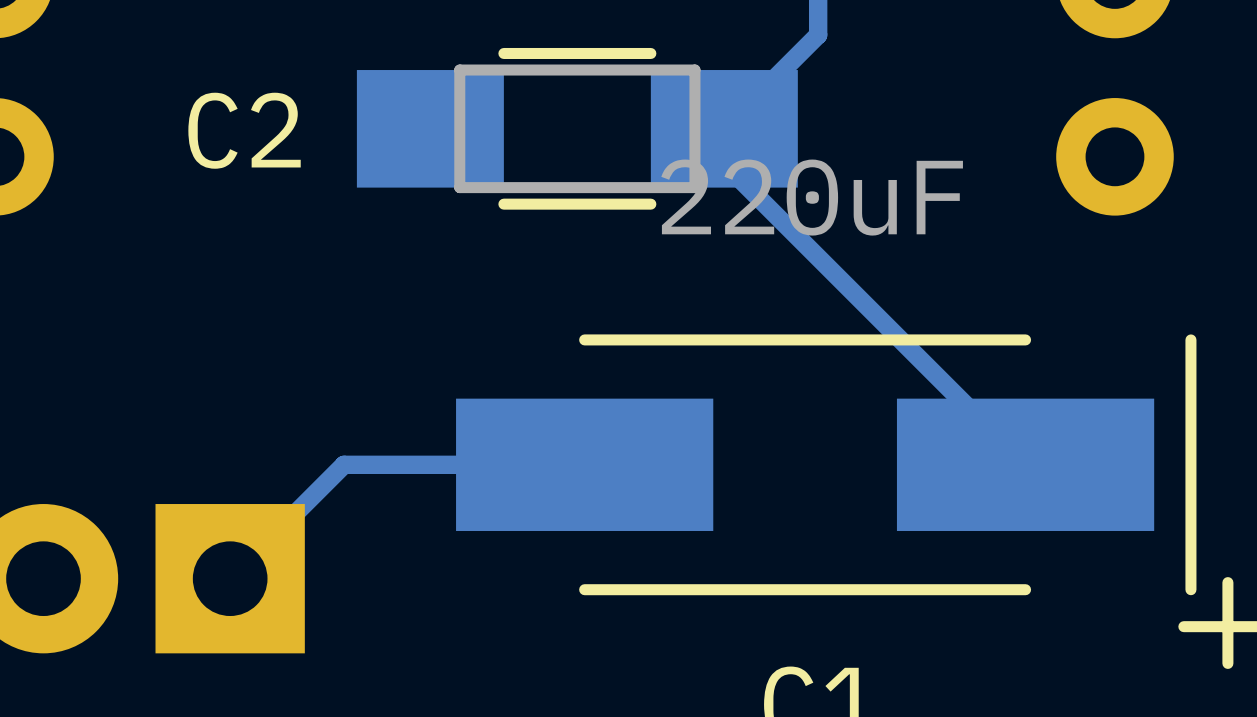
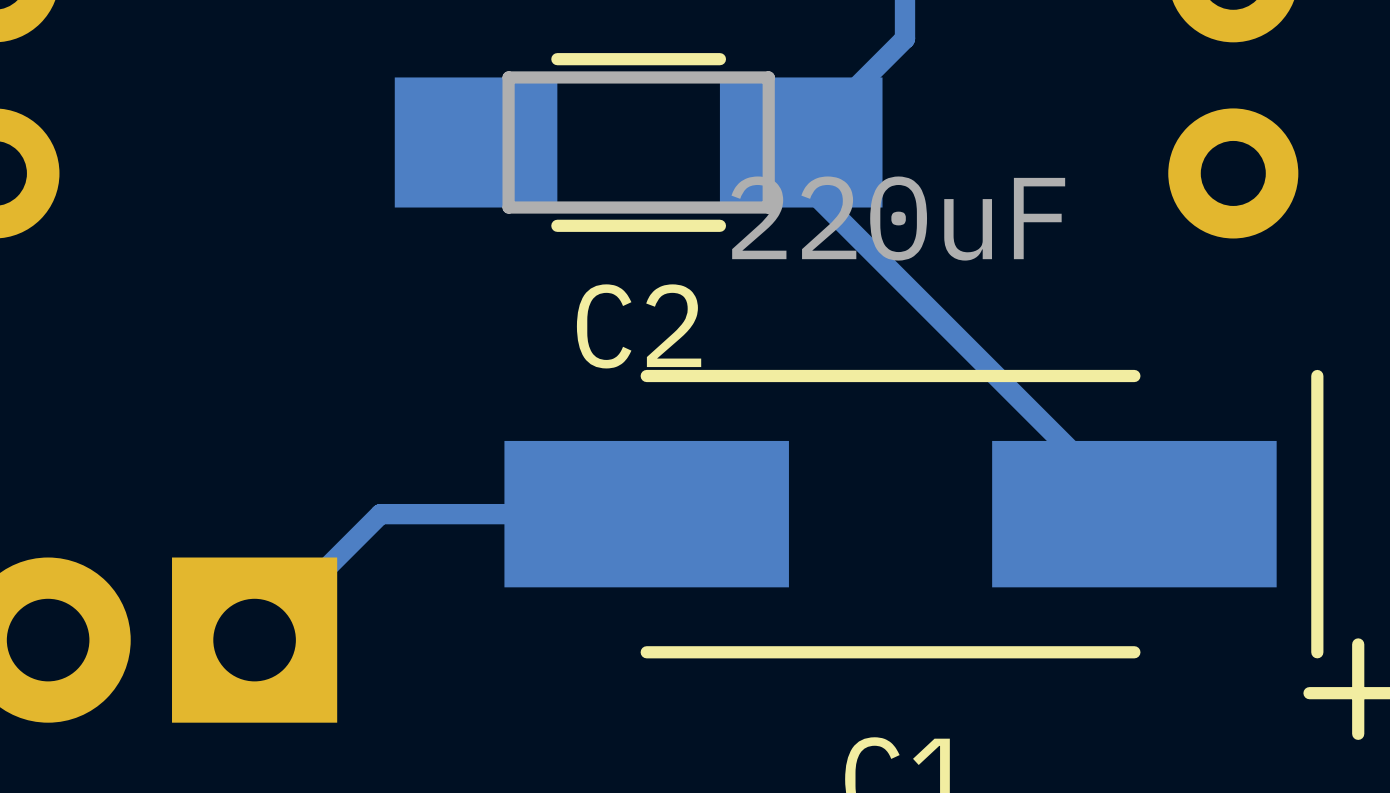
C2 name position: C2 (244, 130) -> C2 (639, 326)

